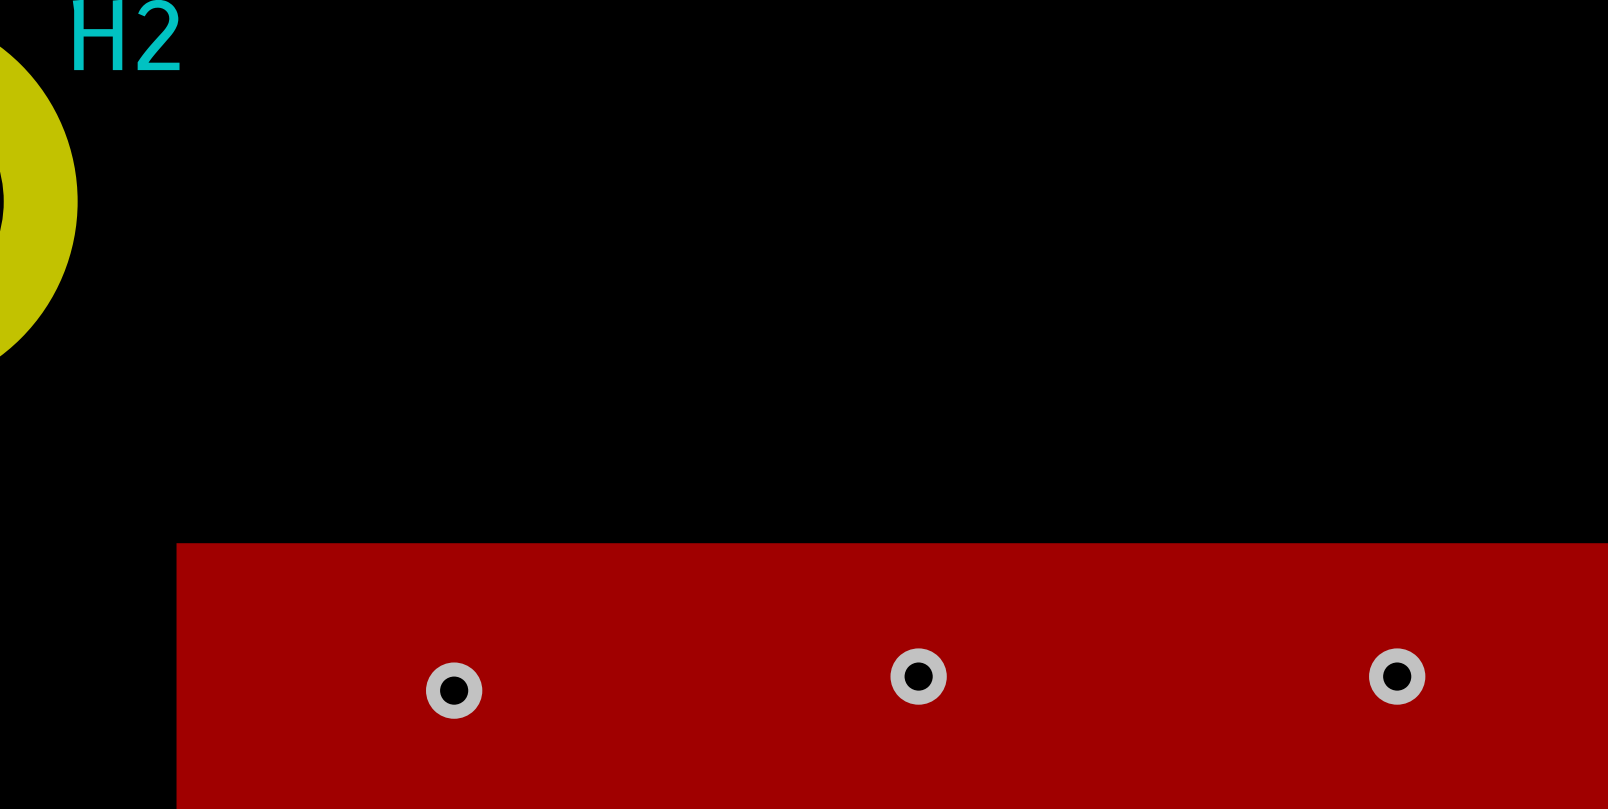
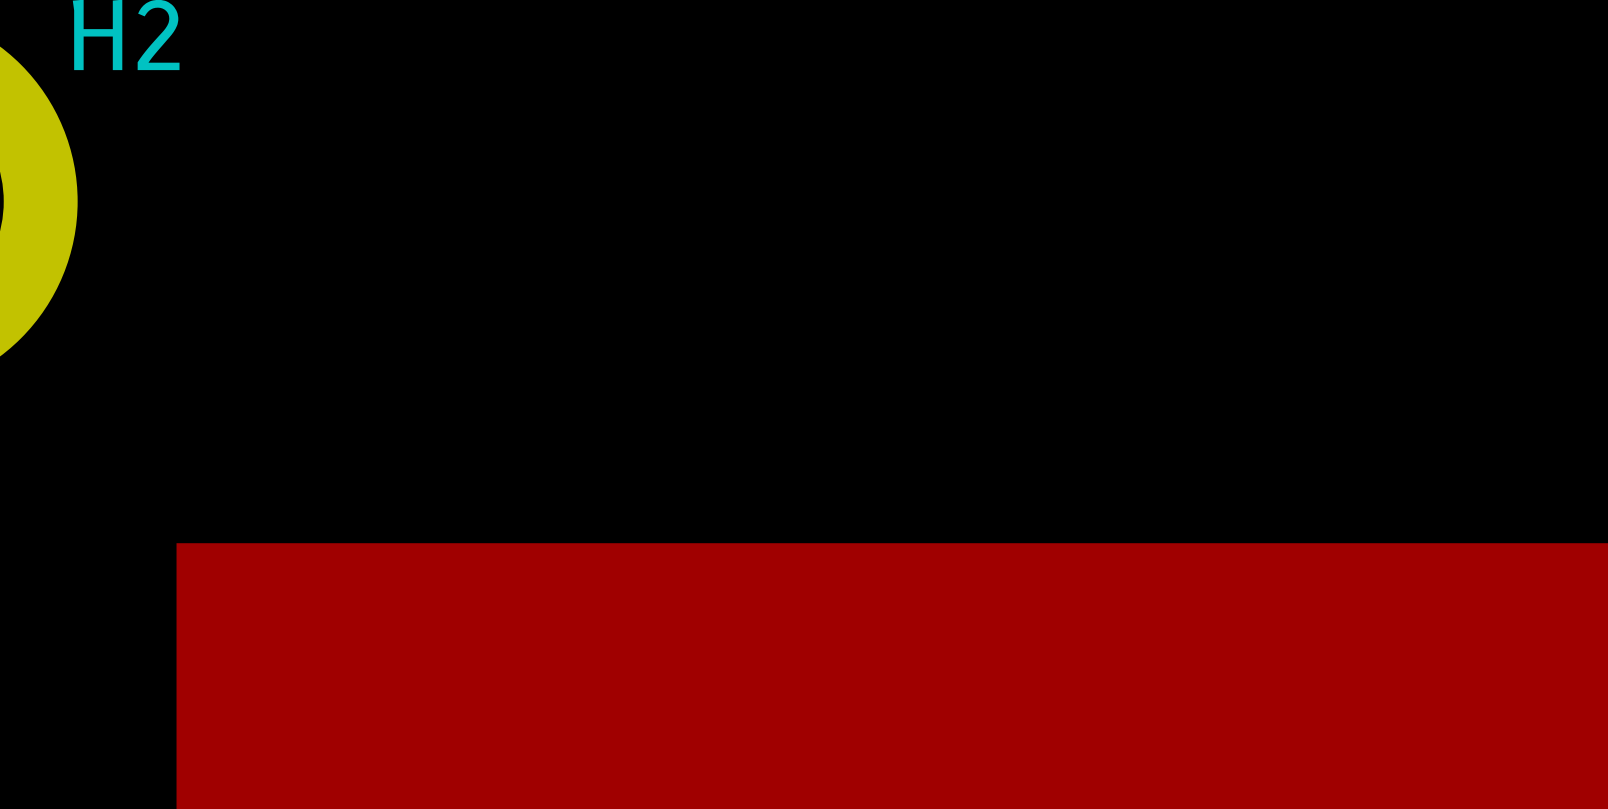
via: (918, 676) -> none
via: (1397, 676) -> none
via: (454, 690) -> none

